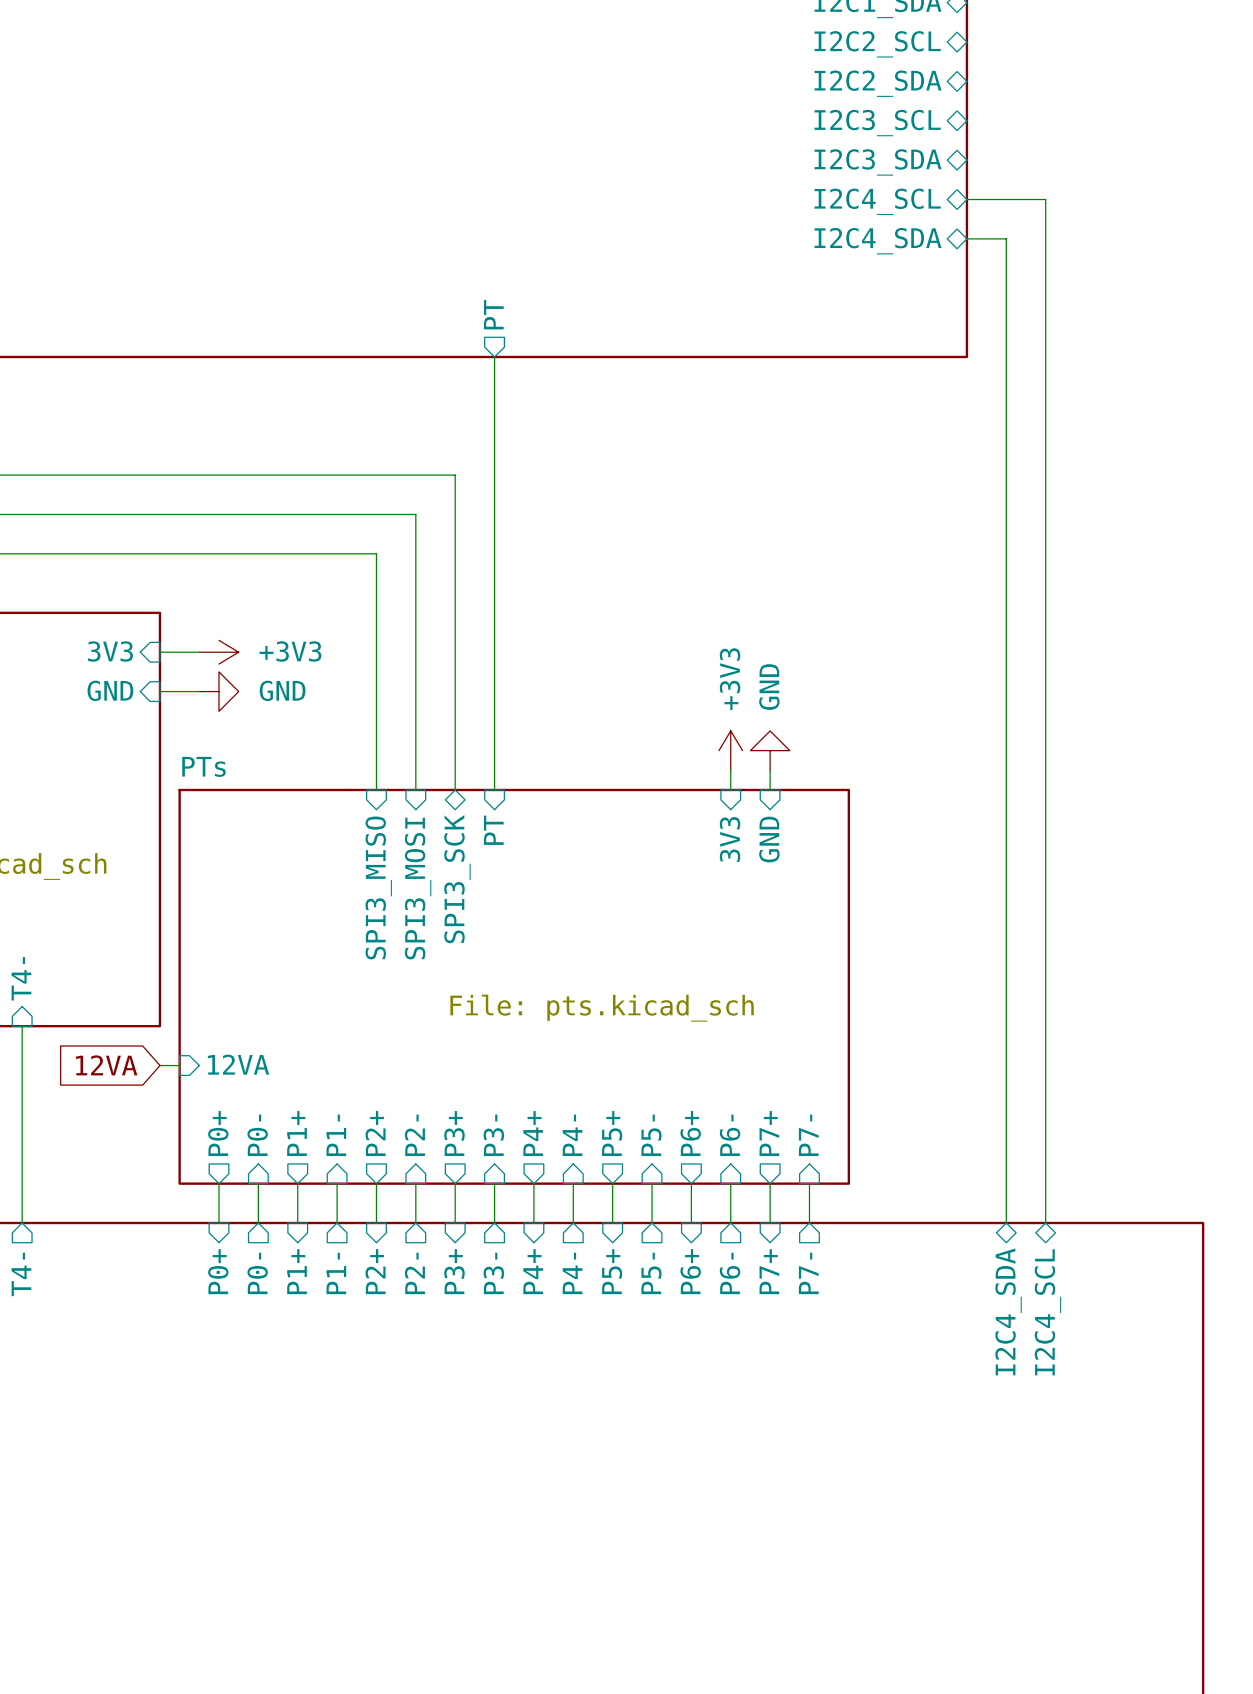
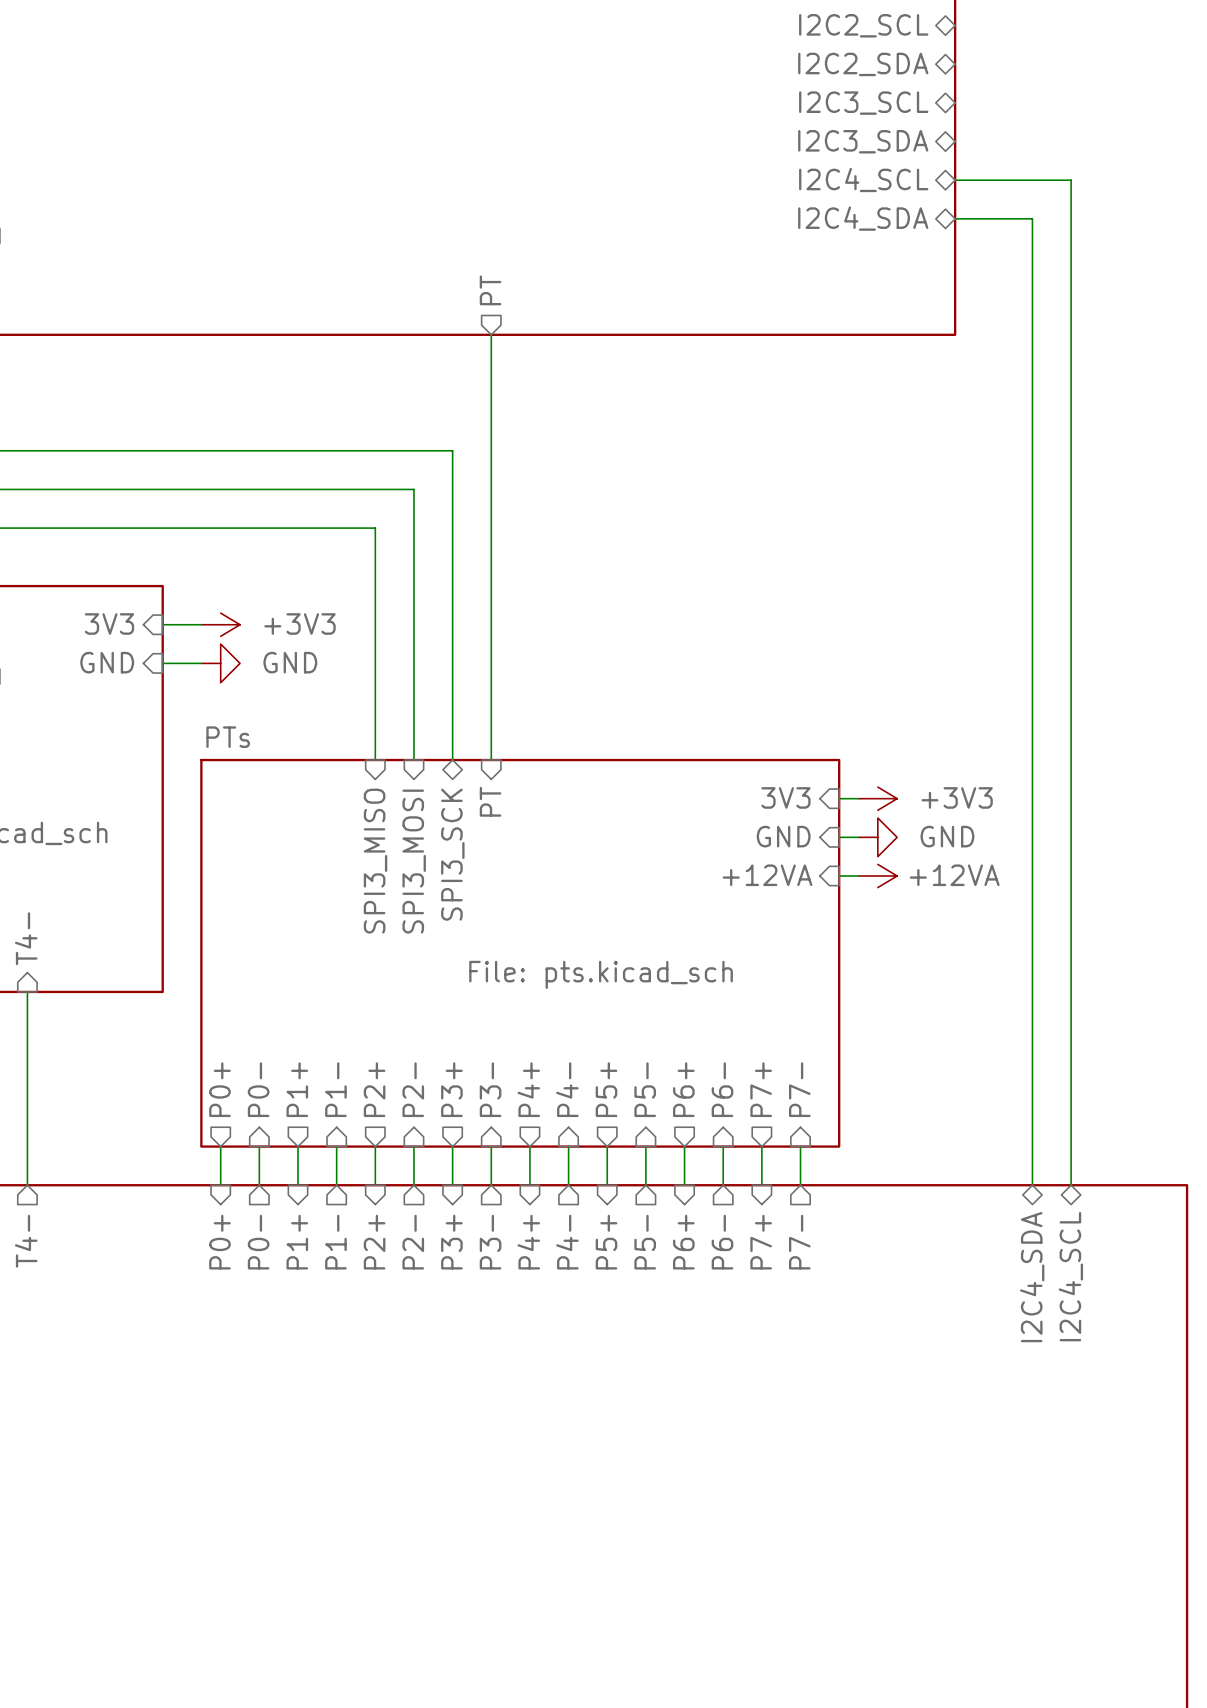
wire: (1045, 199) (1045, 238) -> (993, 218) (1032, 218)
wire: none -> (1032, 180) (1071, 180) (1071, 1185)
wire: (1006, 238) (1006, 1223) -> none
power symbol rotation: 0° (730, 750) -> 90° clockwise (877, 798)
power symbol position: +3V3 (730, 750) -> +3V3 (877, 798)
power symbol rotation: 0° (770, 750) -> 90° clockwise (877, 837)
power symbol position: GND (770, 750) -> GND (877, 837)
wire: (730, 770) (730, 789) -> none
wire: (770, 770) (770, 789) -> none
sheet PTs shape: [178, 788, 851, 1185] -> [200, 758, 841, 1148]
wire: none -> (839, 798) (858, 798)
sheet pin rotation: 0° (730, 839) -> 90° clockwise (785, 797)
sheet pin rotation: 0° (769, 839) -> 90° clockwise (783, 836)
wire: none -> (839, 837) (858, 837)
sheet pin: none -> +12VA (767, 875)
wire: none -> (839, 875) (858, 875)
power symbol: none -> +12VA (877, 875)
sheet pin: 12VA (238, 1064) -> none
global label: 12VA (106, 1065) -> none
wire: (159, 1065) (179, 1065) -> none
sheet pin: I2C4_SDA (1008, 1311) -> none
sheet pin: I2C4_SCL (1047, 1312) -> I2C4_SDA (1032, 1277)
sheet pin: none -> I2C4_SCL (1070, 1276)

